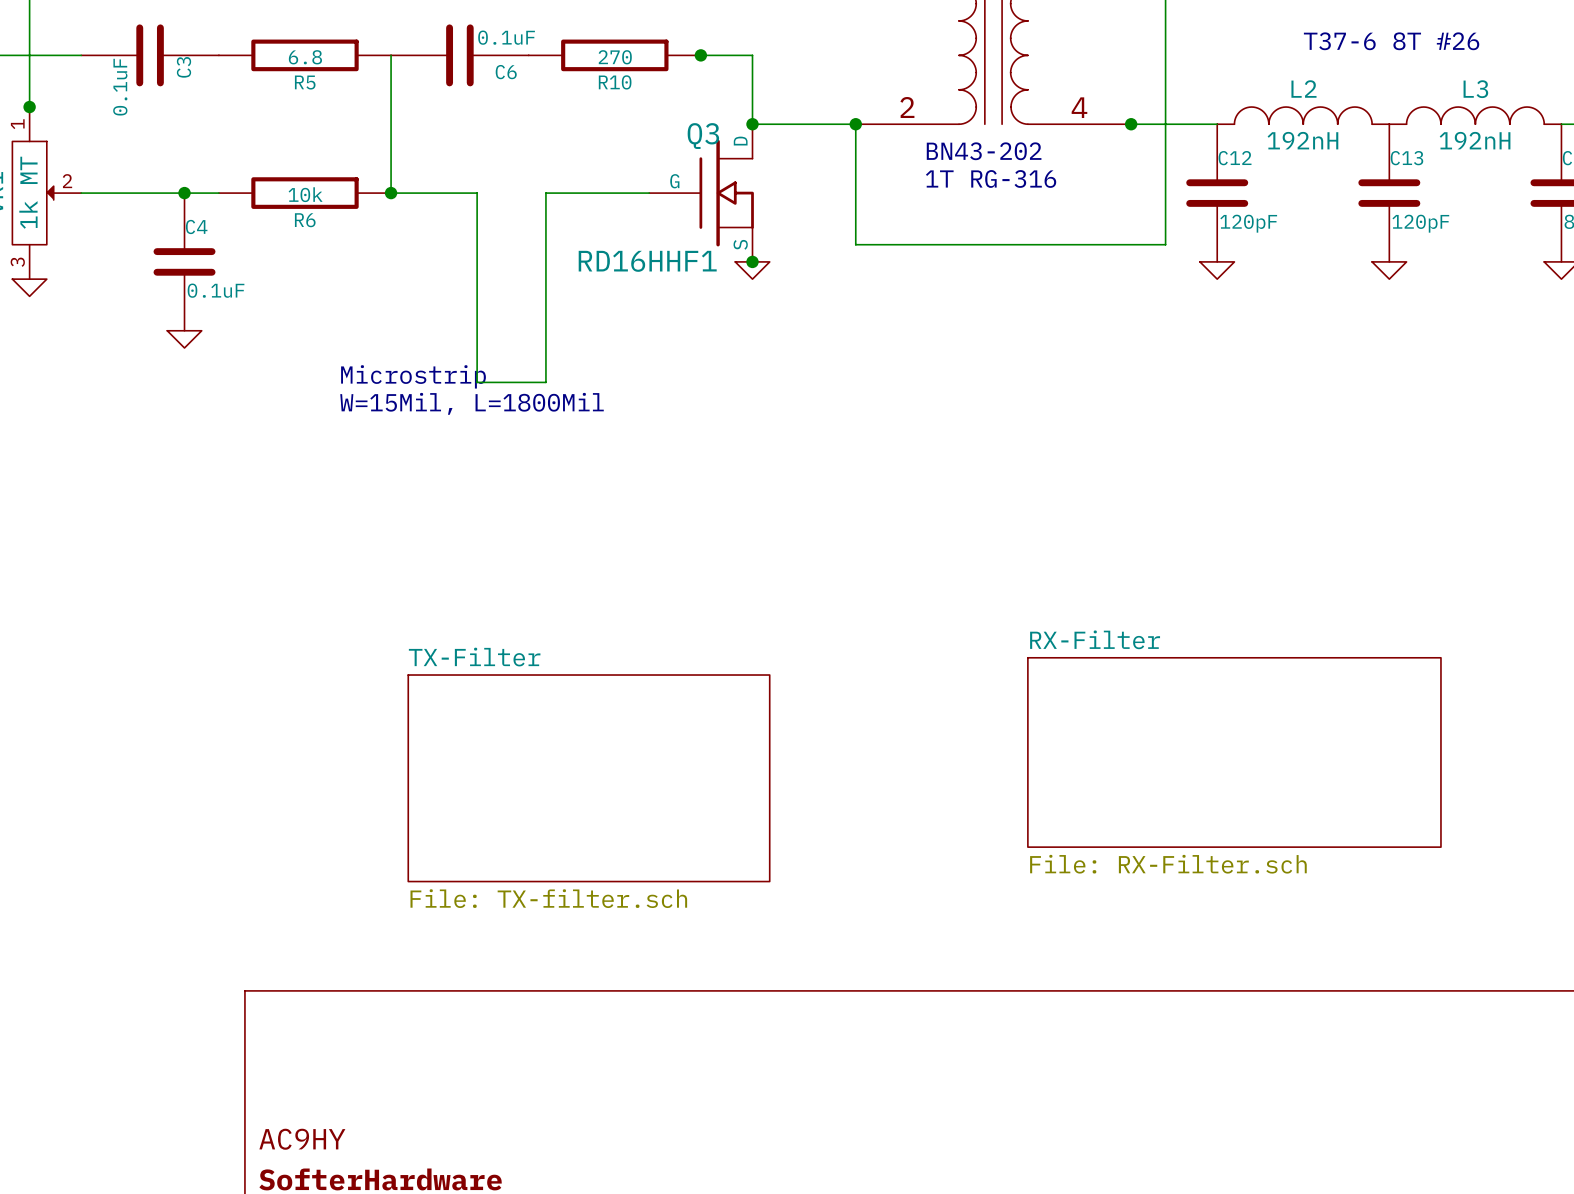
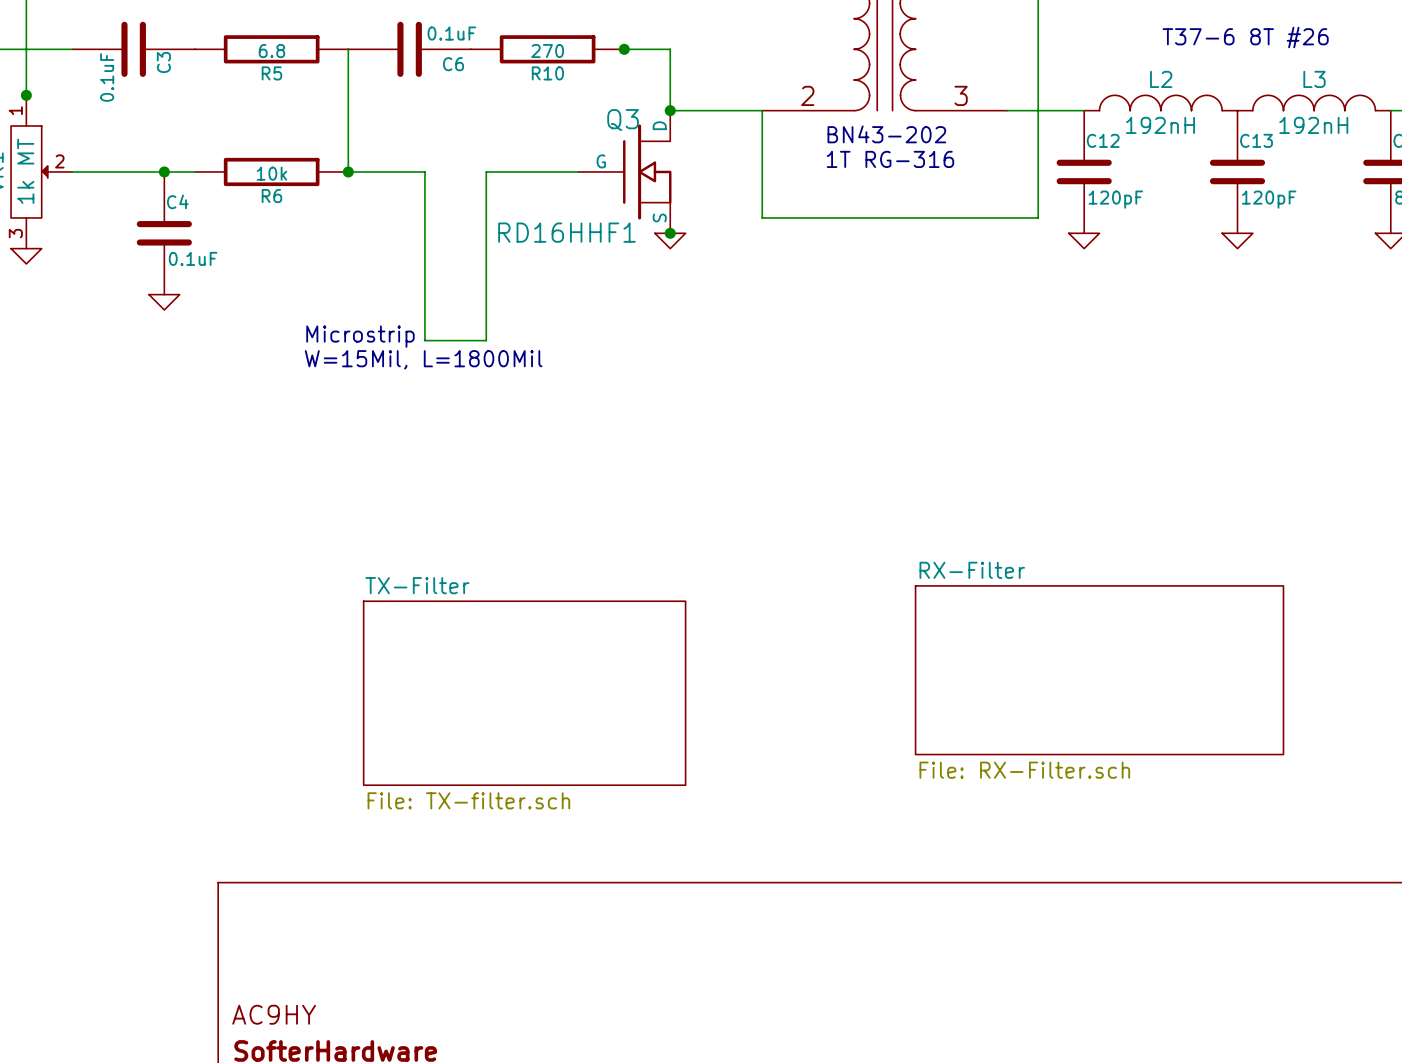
part pin number: 4 (1079, 107) -> 3 (961, 95)
junction: (855, 124) -> none
junction: (1131, 124) -> none

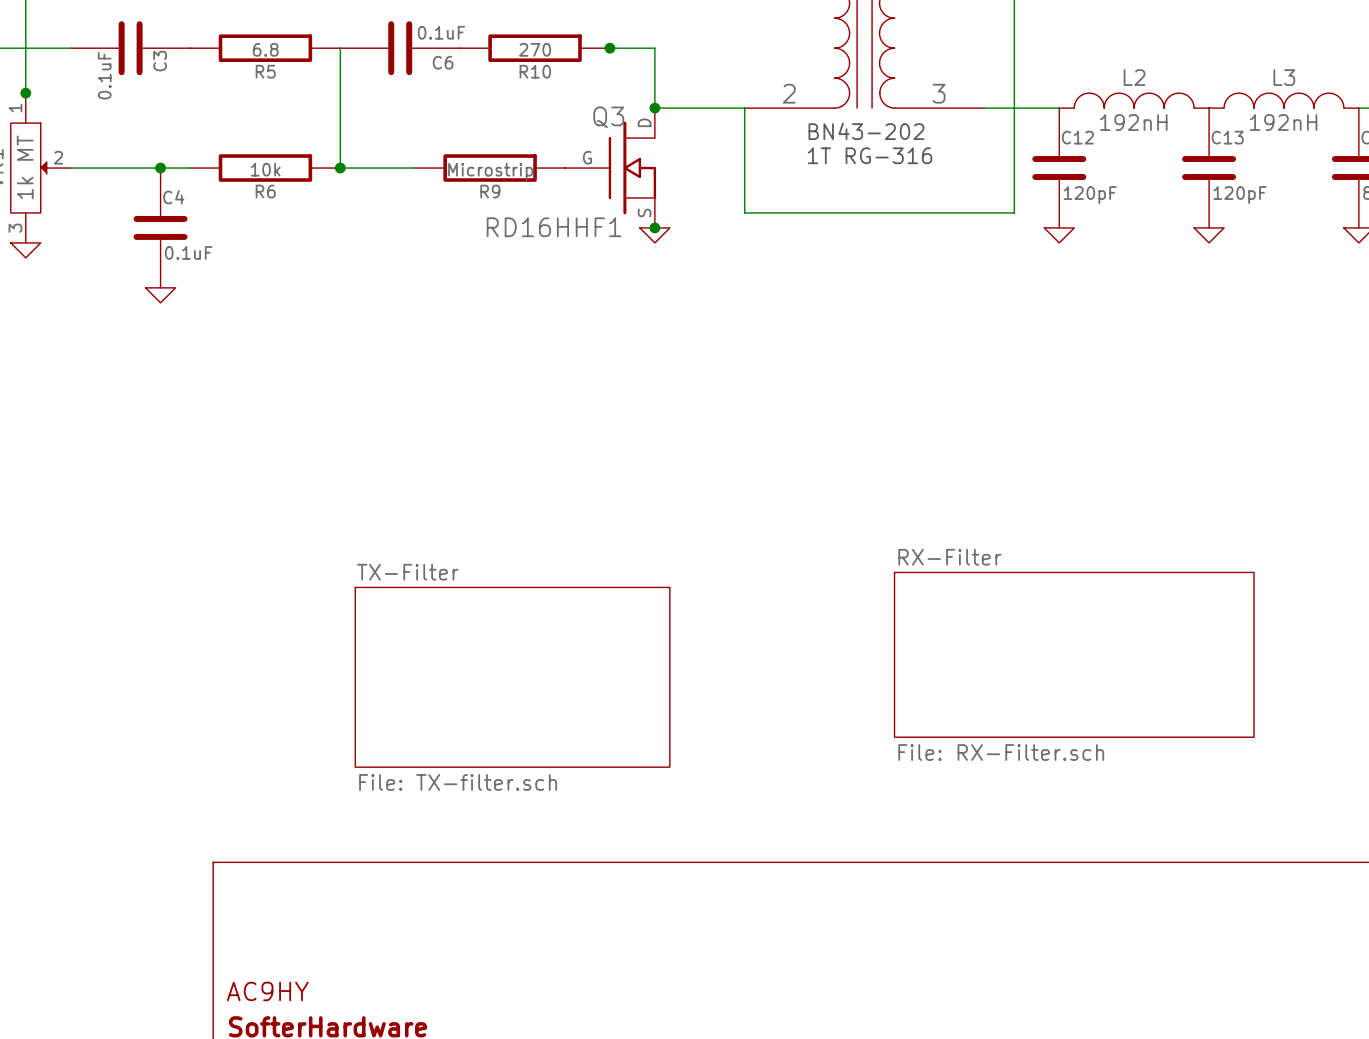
text: T37-6 8T #26 (1245, 37) -> none
wire: (424, 171) (424, 340) (486, 340) (486, 171) (578, 171) -> none
R9: none -> Microstrip (490, 168)
text: Microstrip (360, 336) -> none
text: W=15Mil, L=1800Mil (423, 359) -> none

